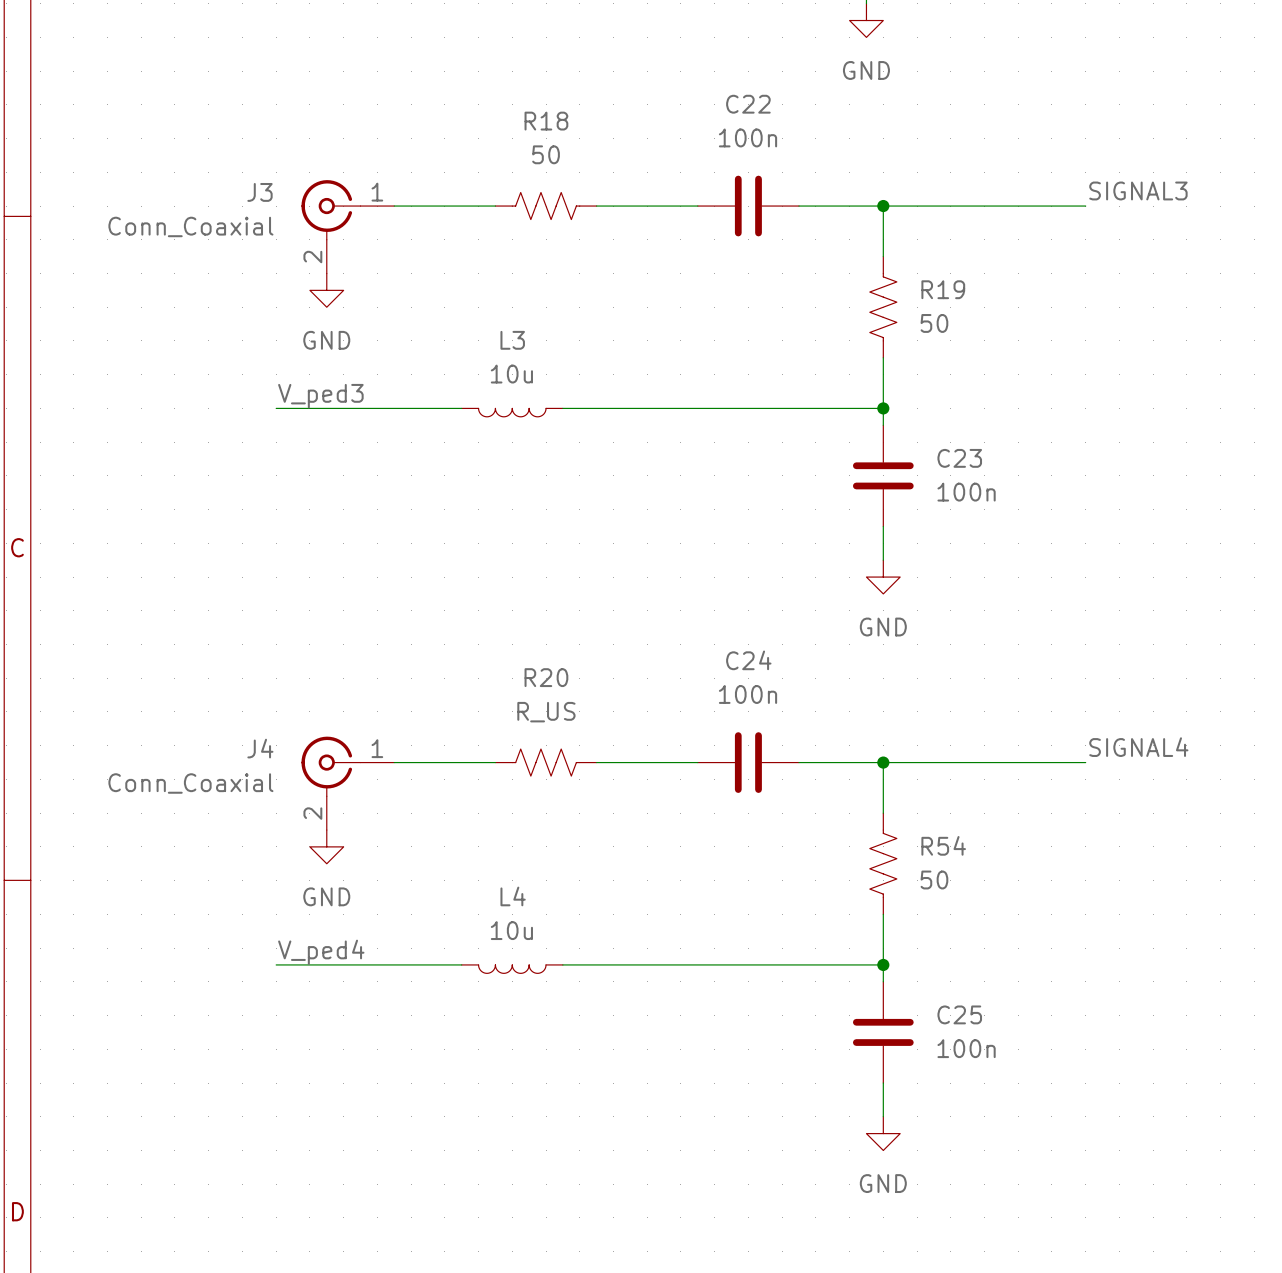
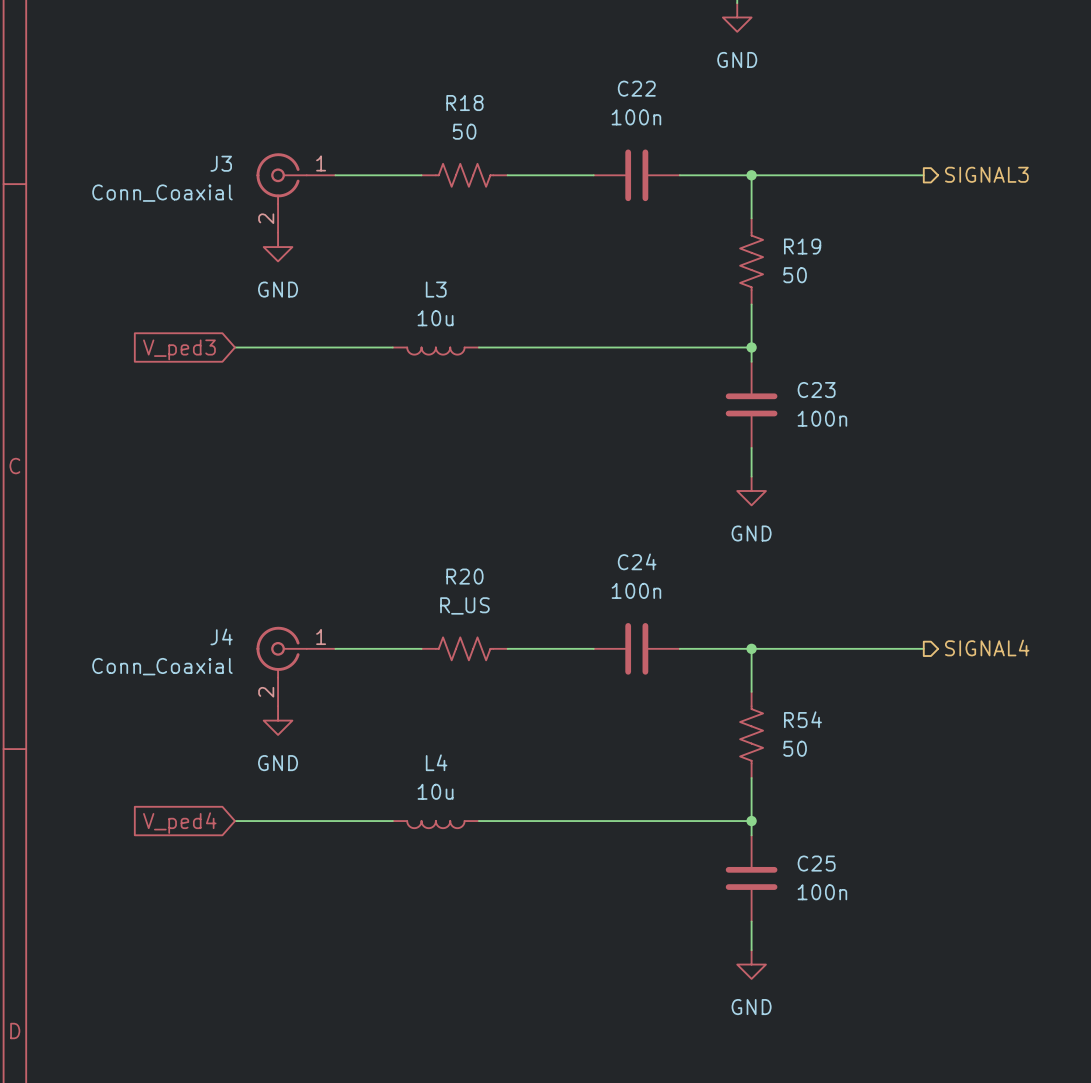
label: SIGNAL3 (1138, 190) -> none
hierarchical label: none -> SIGNAL3 (986, 174)
label: V_ped3 (320, 396) -> none
global label: none -> V_ped3 (179, 349)
label: SIGNAL4 (1138, 747) -> none
hierarchical label: none -> SIGNAL4 (987, 647)
label: V_ped4 (321, 952) -> none
global label: none -> V_ped4 (179, 823)

